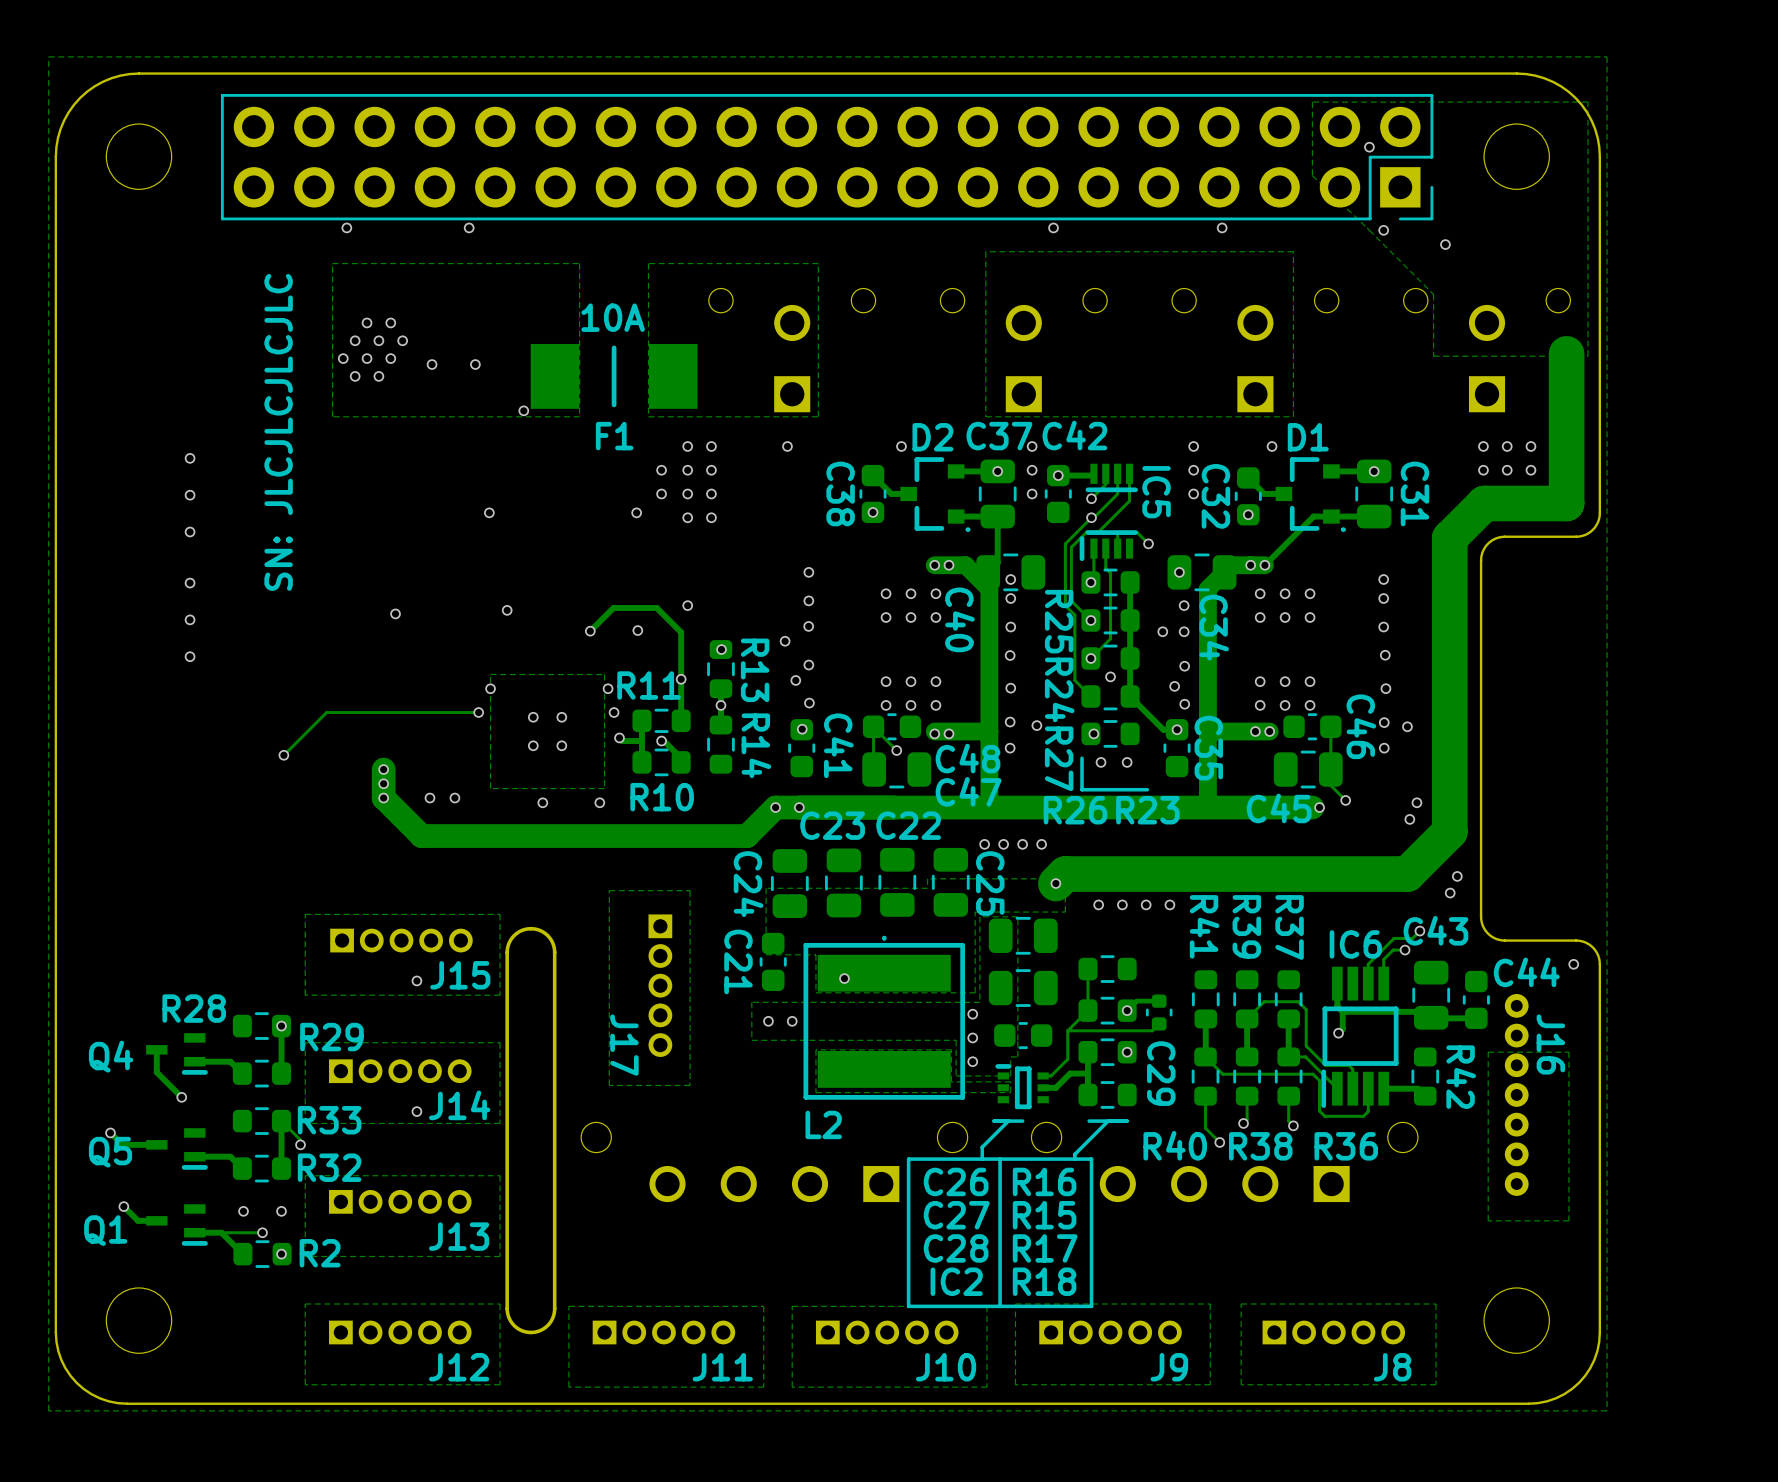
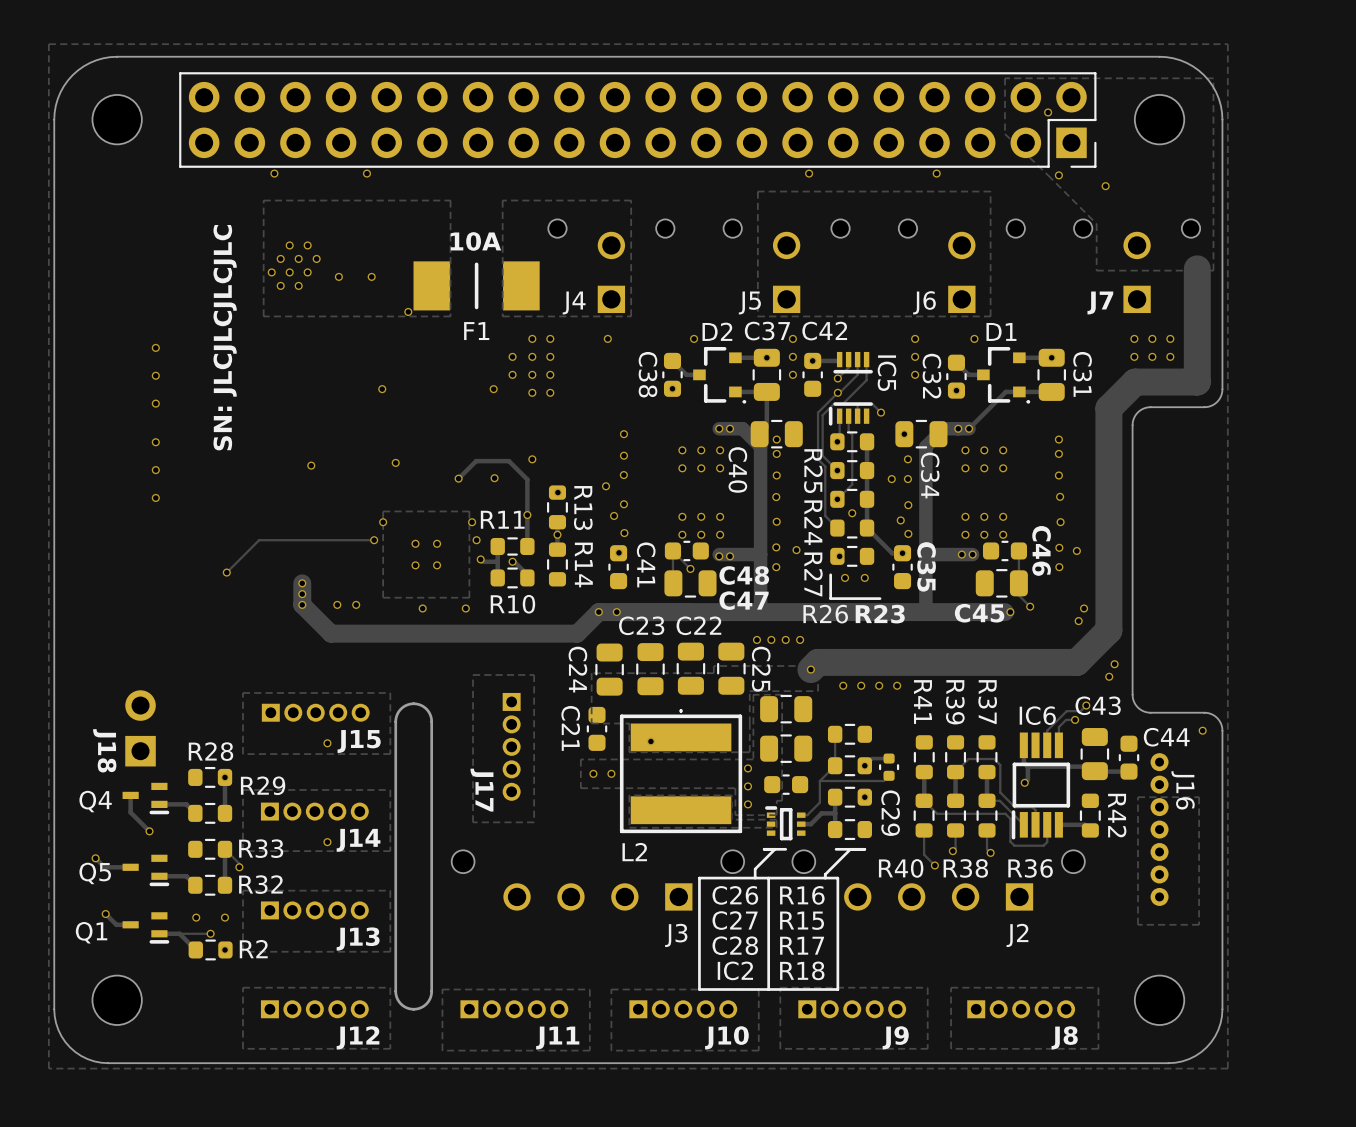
J4 name: none -> J4 (574, 302)
J5 name: none -> J5 (749, 302)
J6 name: none -> J6 (924, 302)
J7 name: none -> J7 (1100, 302)
J18: none -> (140, 728)
R28 name position: R28 (194, 1008) -> R28 (210, 751)
J3 name: none -> J3 (676, 935)
J2 name: none -> J2 (1017, 935)

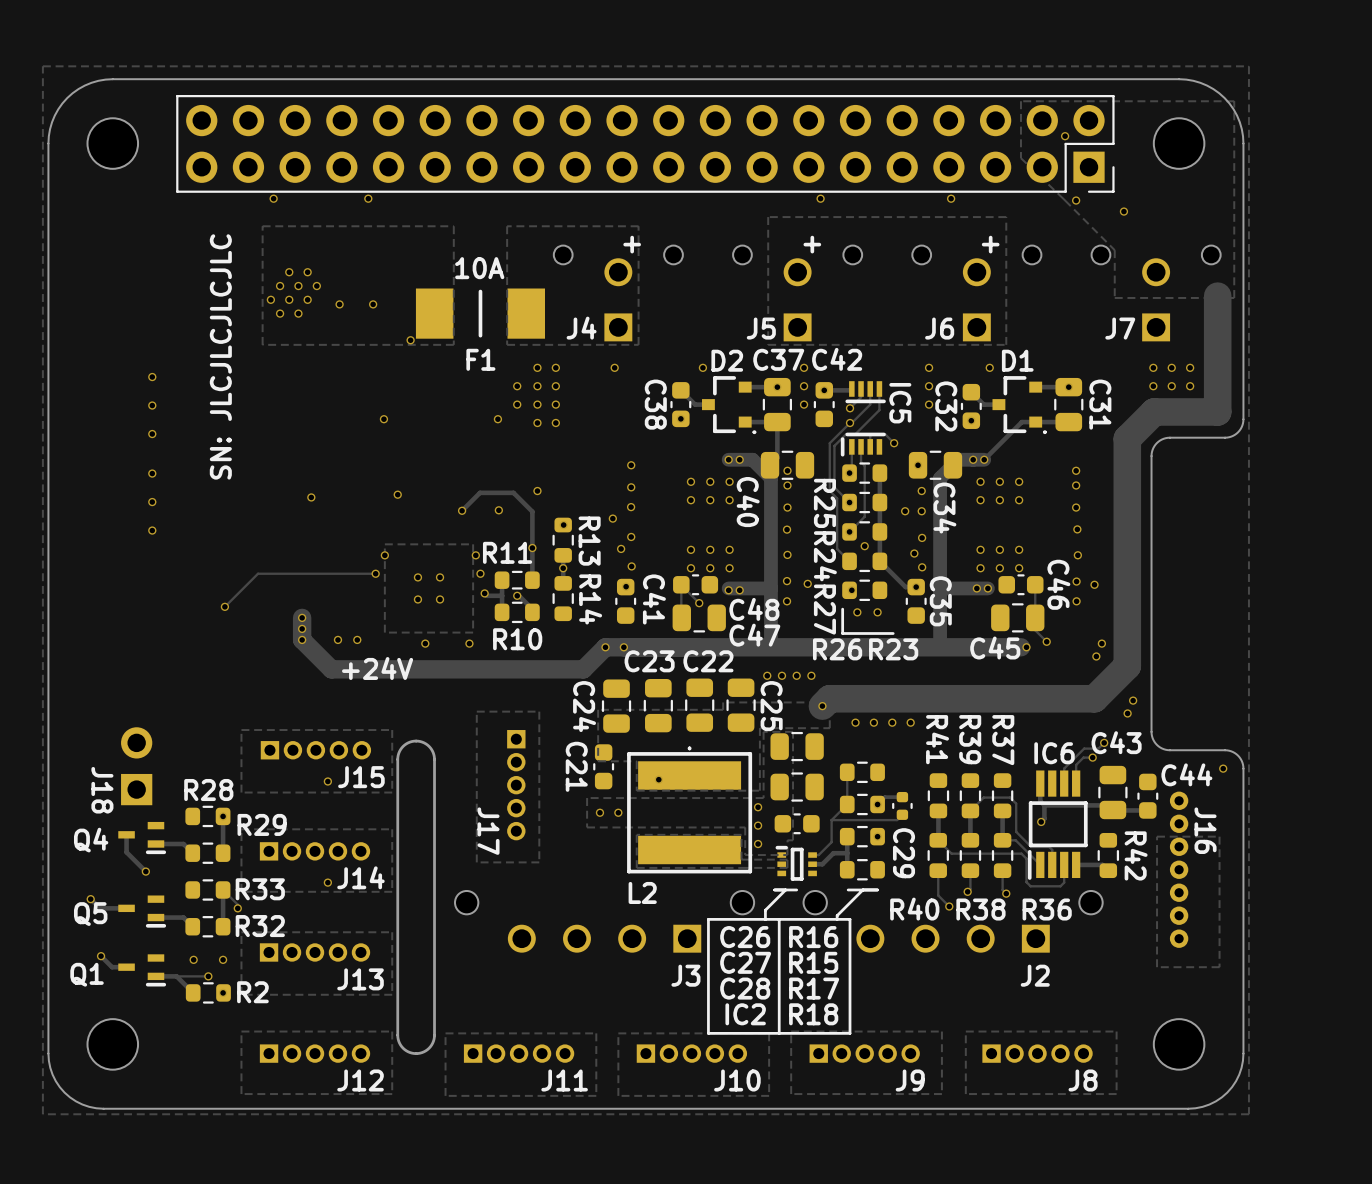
text: none -> + (632, 244)
text: none -> + (812, 244)
text: none -> + (990, 244)
text: none -> +24V (377, 668)

